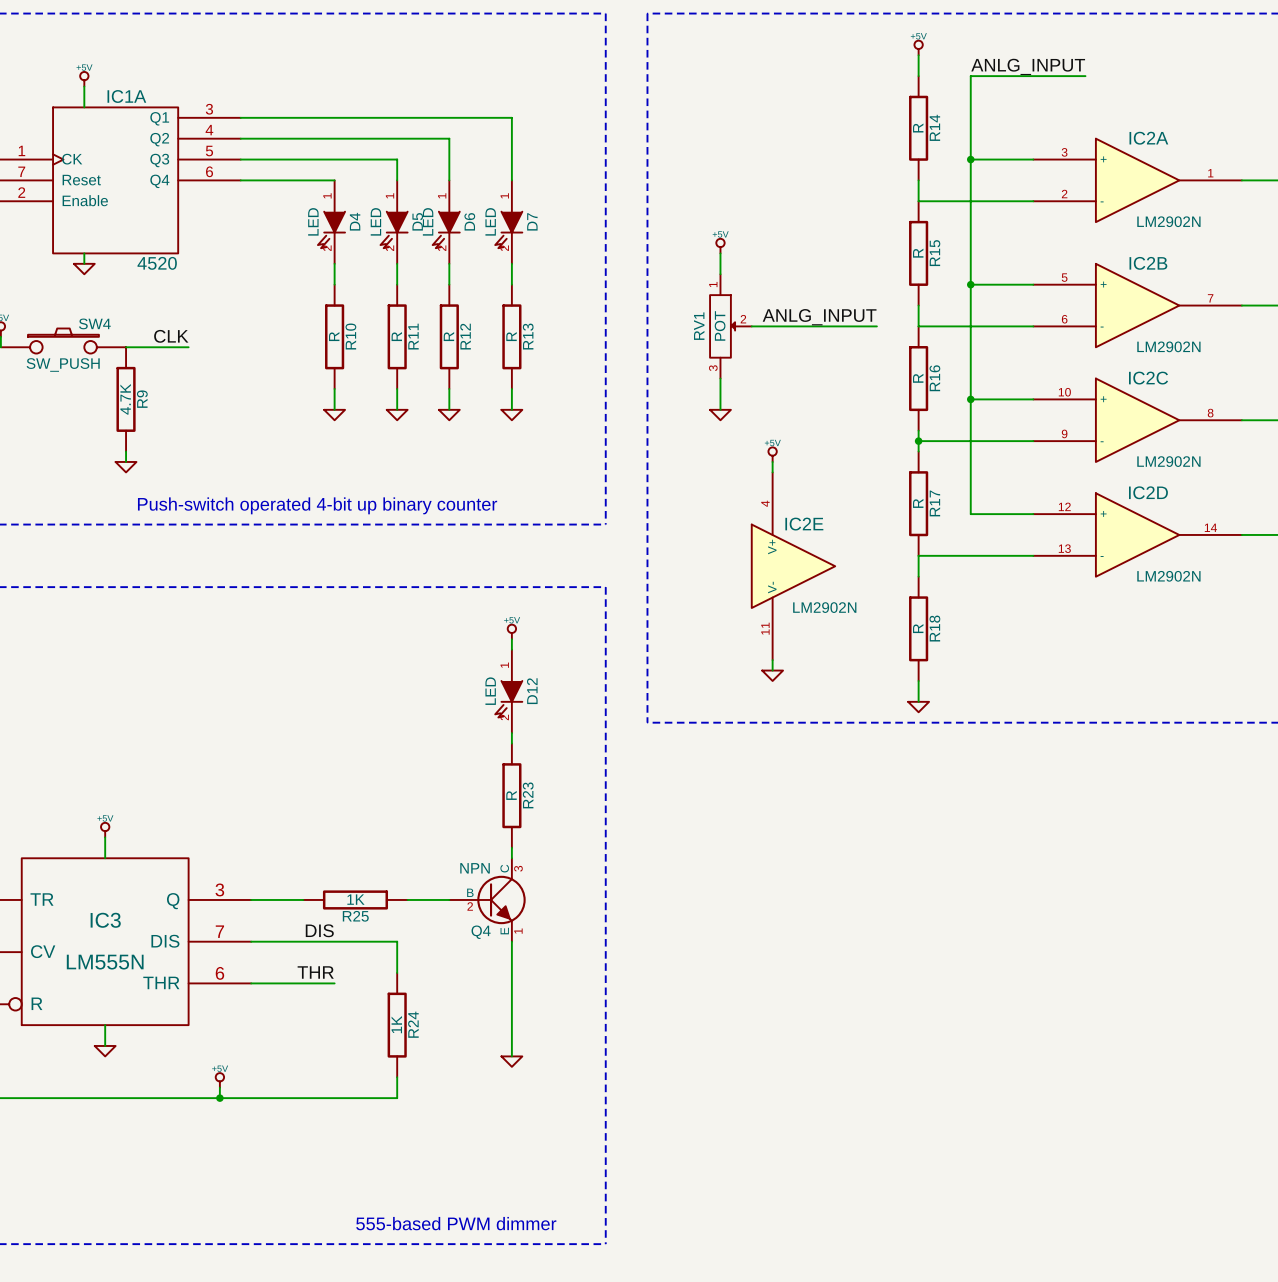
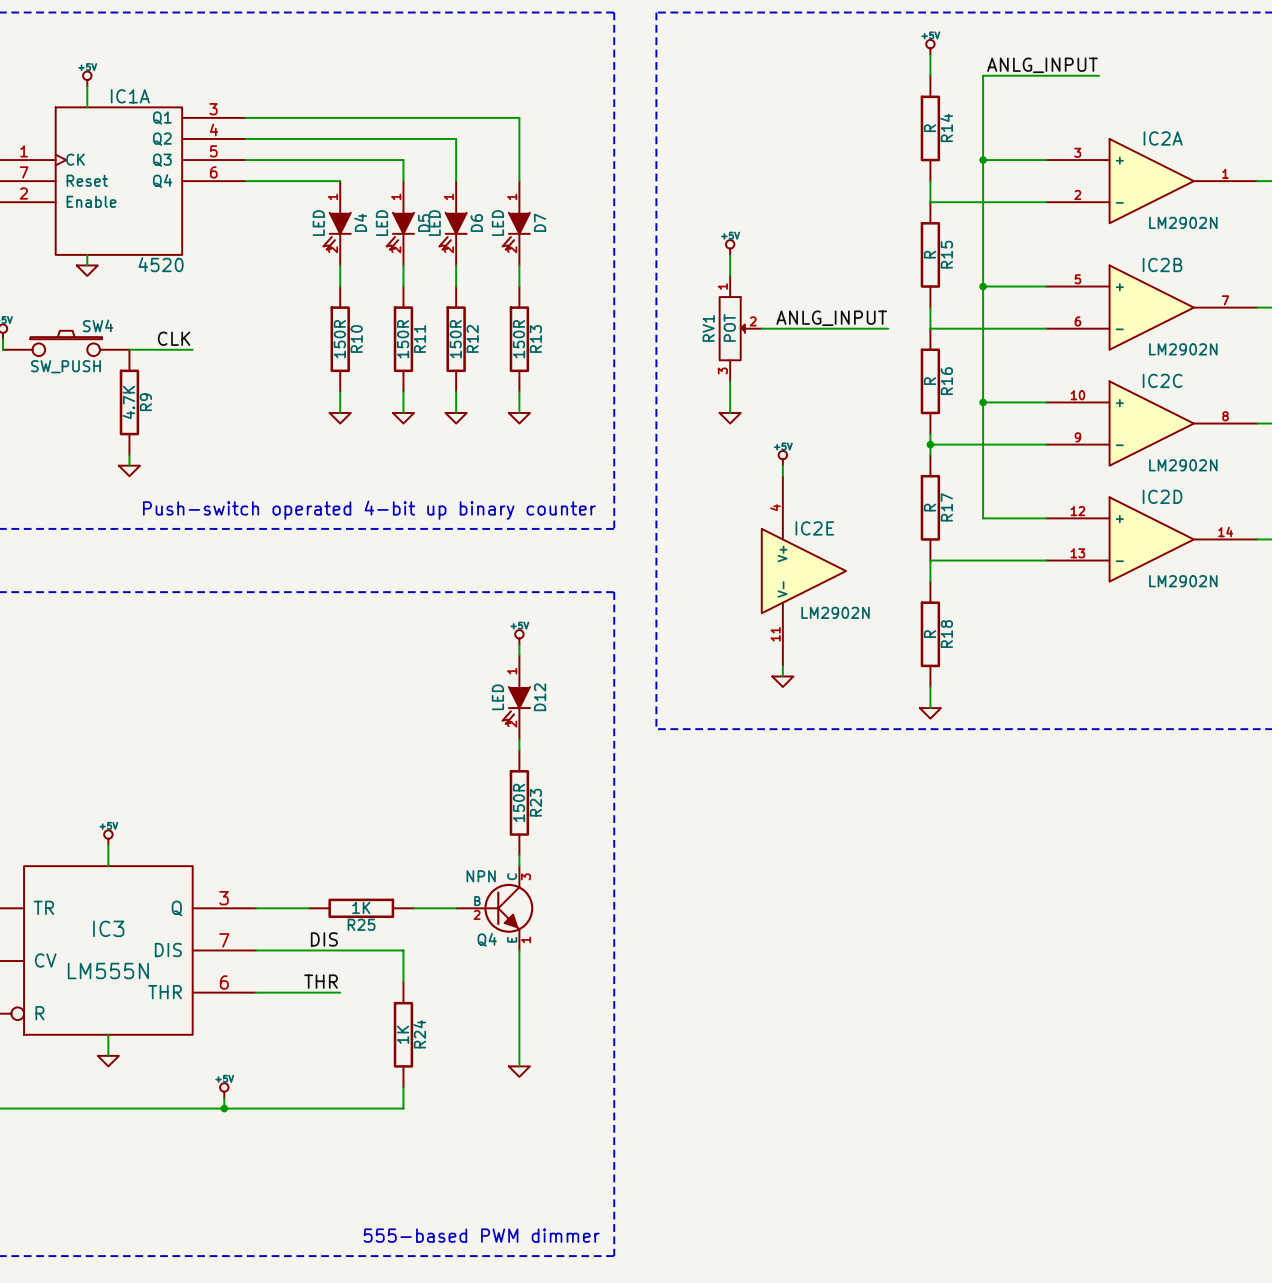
R10 value: R (334, 336) -> 150R (339, 339)
R11 value: R (396, 336) -> 150R (403, 339)
R12 value: R (448, 336) -> 150R (455, 339)
R13 value: R (511, 336) -> 150R (519, 339)
R23 value: R (511, 795) -> 150R (519, 802)

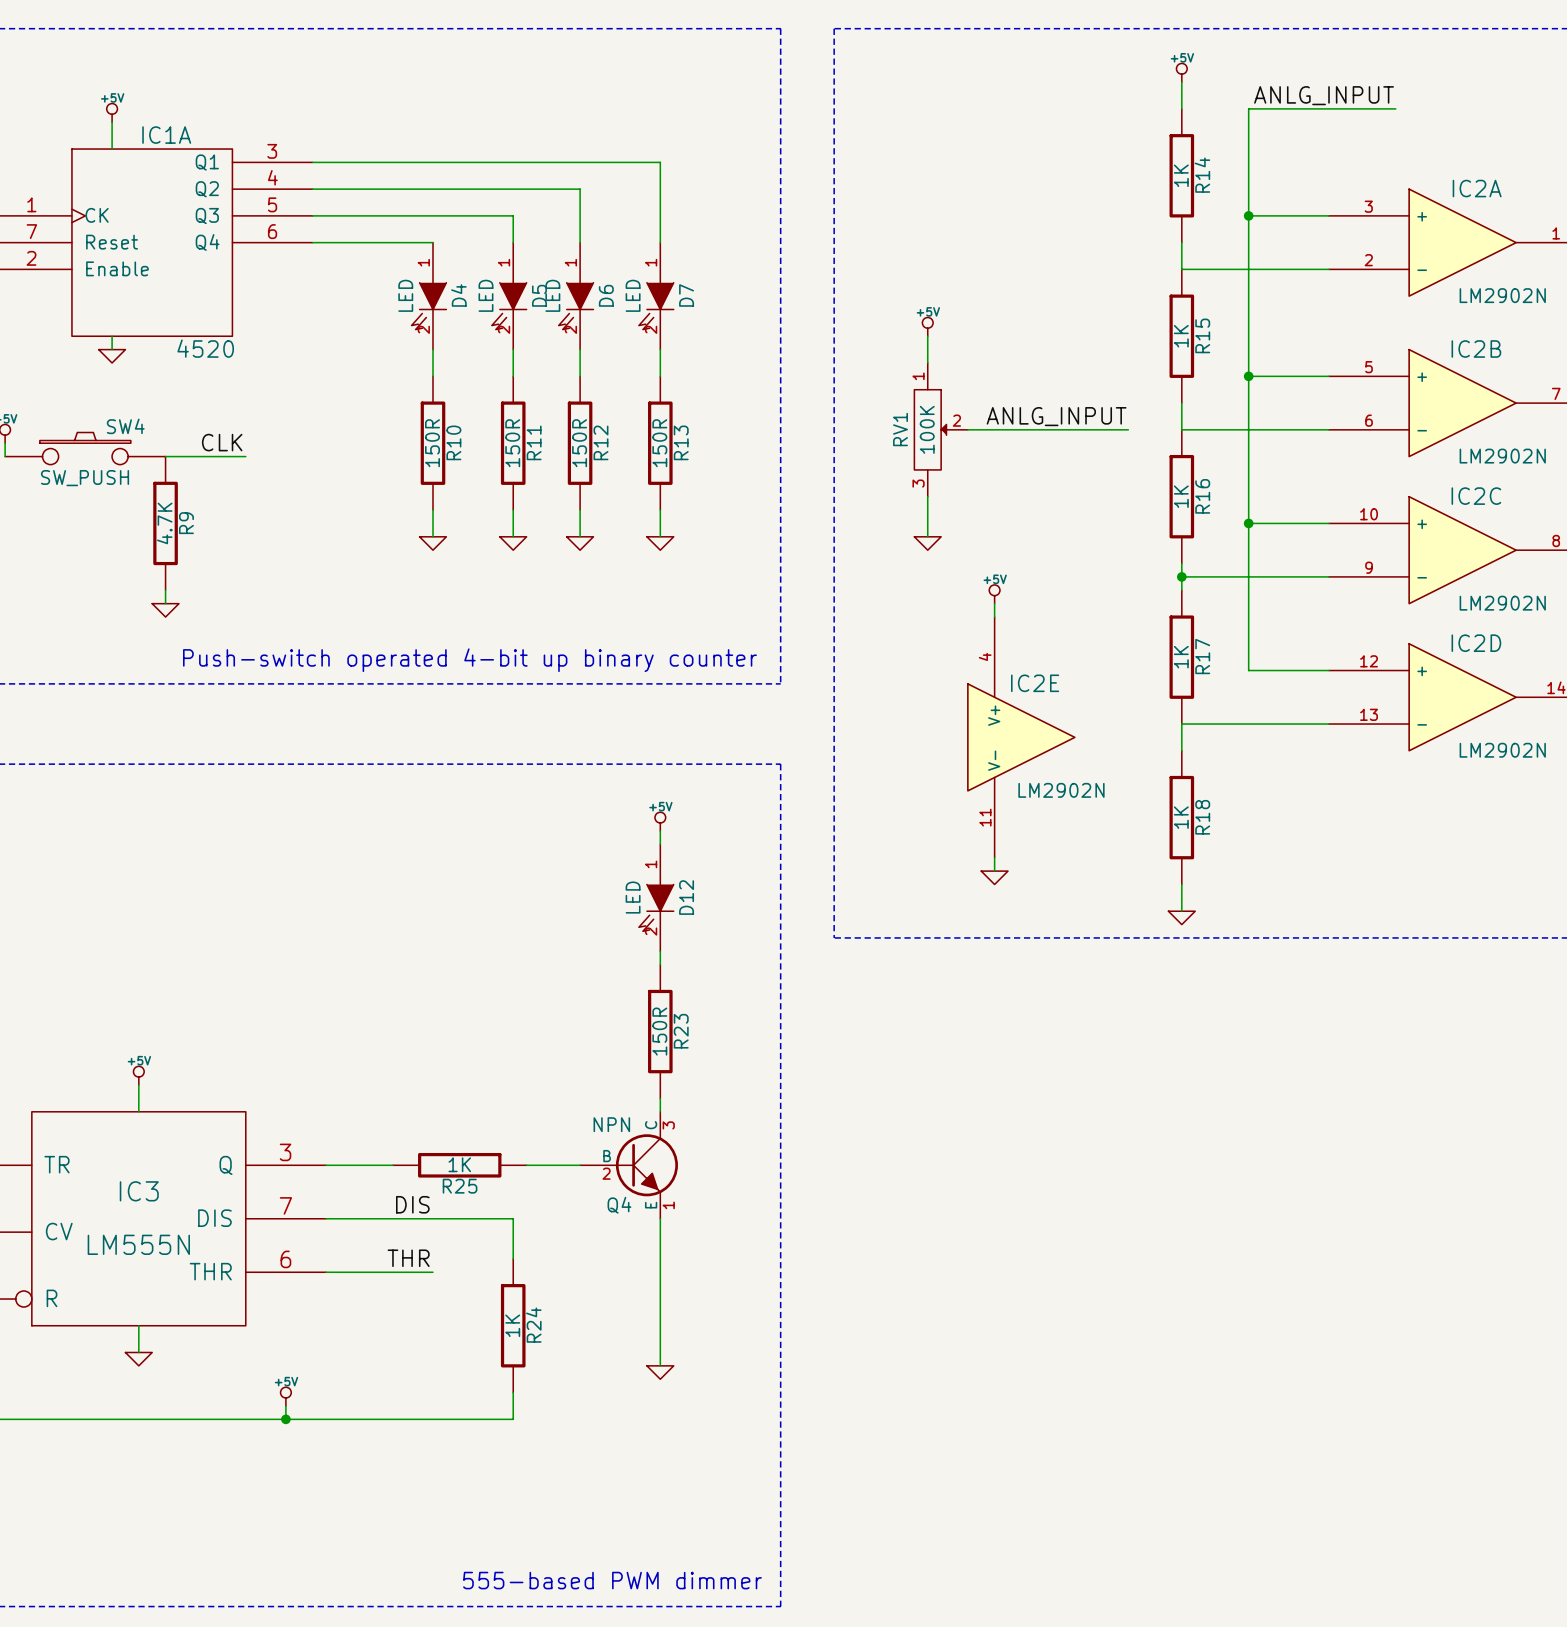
R14 value: R (930, 128) -> 1K (1181, 175)
R15 value: R (930, 254) -> 1K (1181, 336)
RV1 value: POT (729, 327) -> 100K (927, 429)
R16 value: R (930, 381) -> 1K (1181, 496)
R17 value: R (930, 507) -> 1K (1181, 657)
R18 value: R (930, 634) -> 1K (1181, 817)

